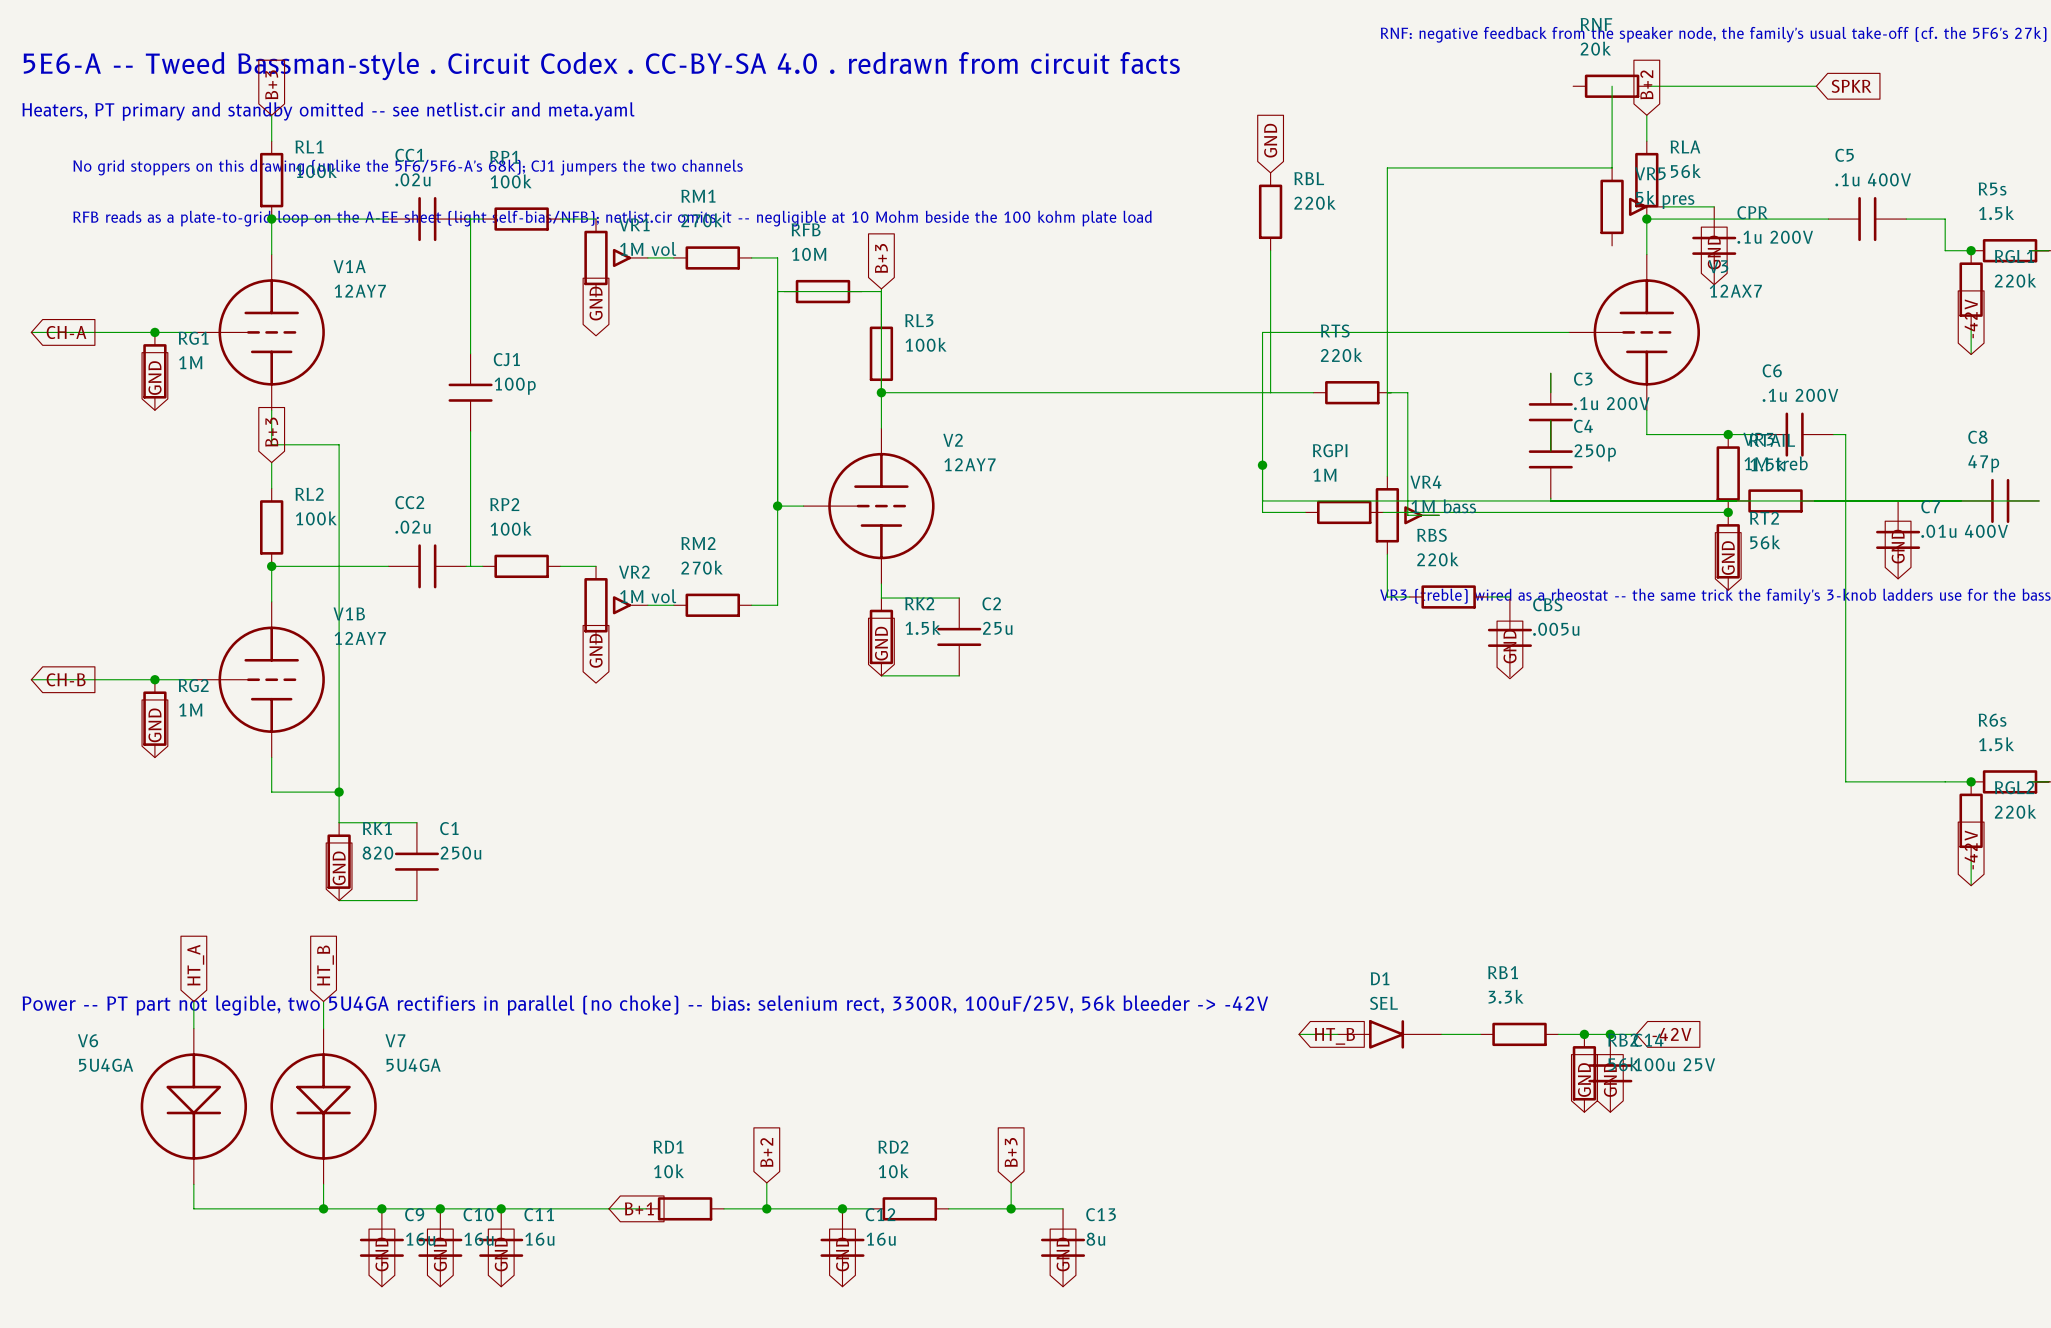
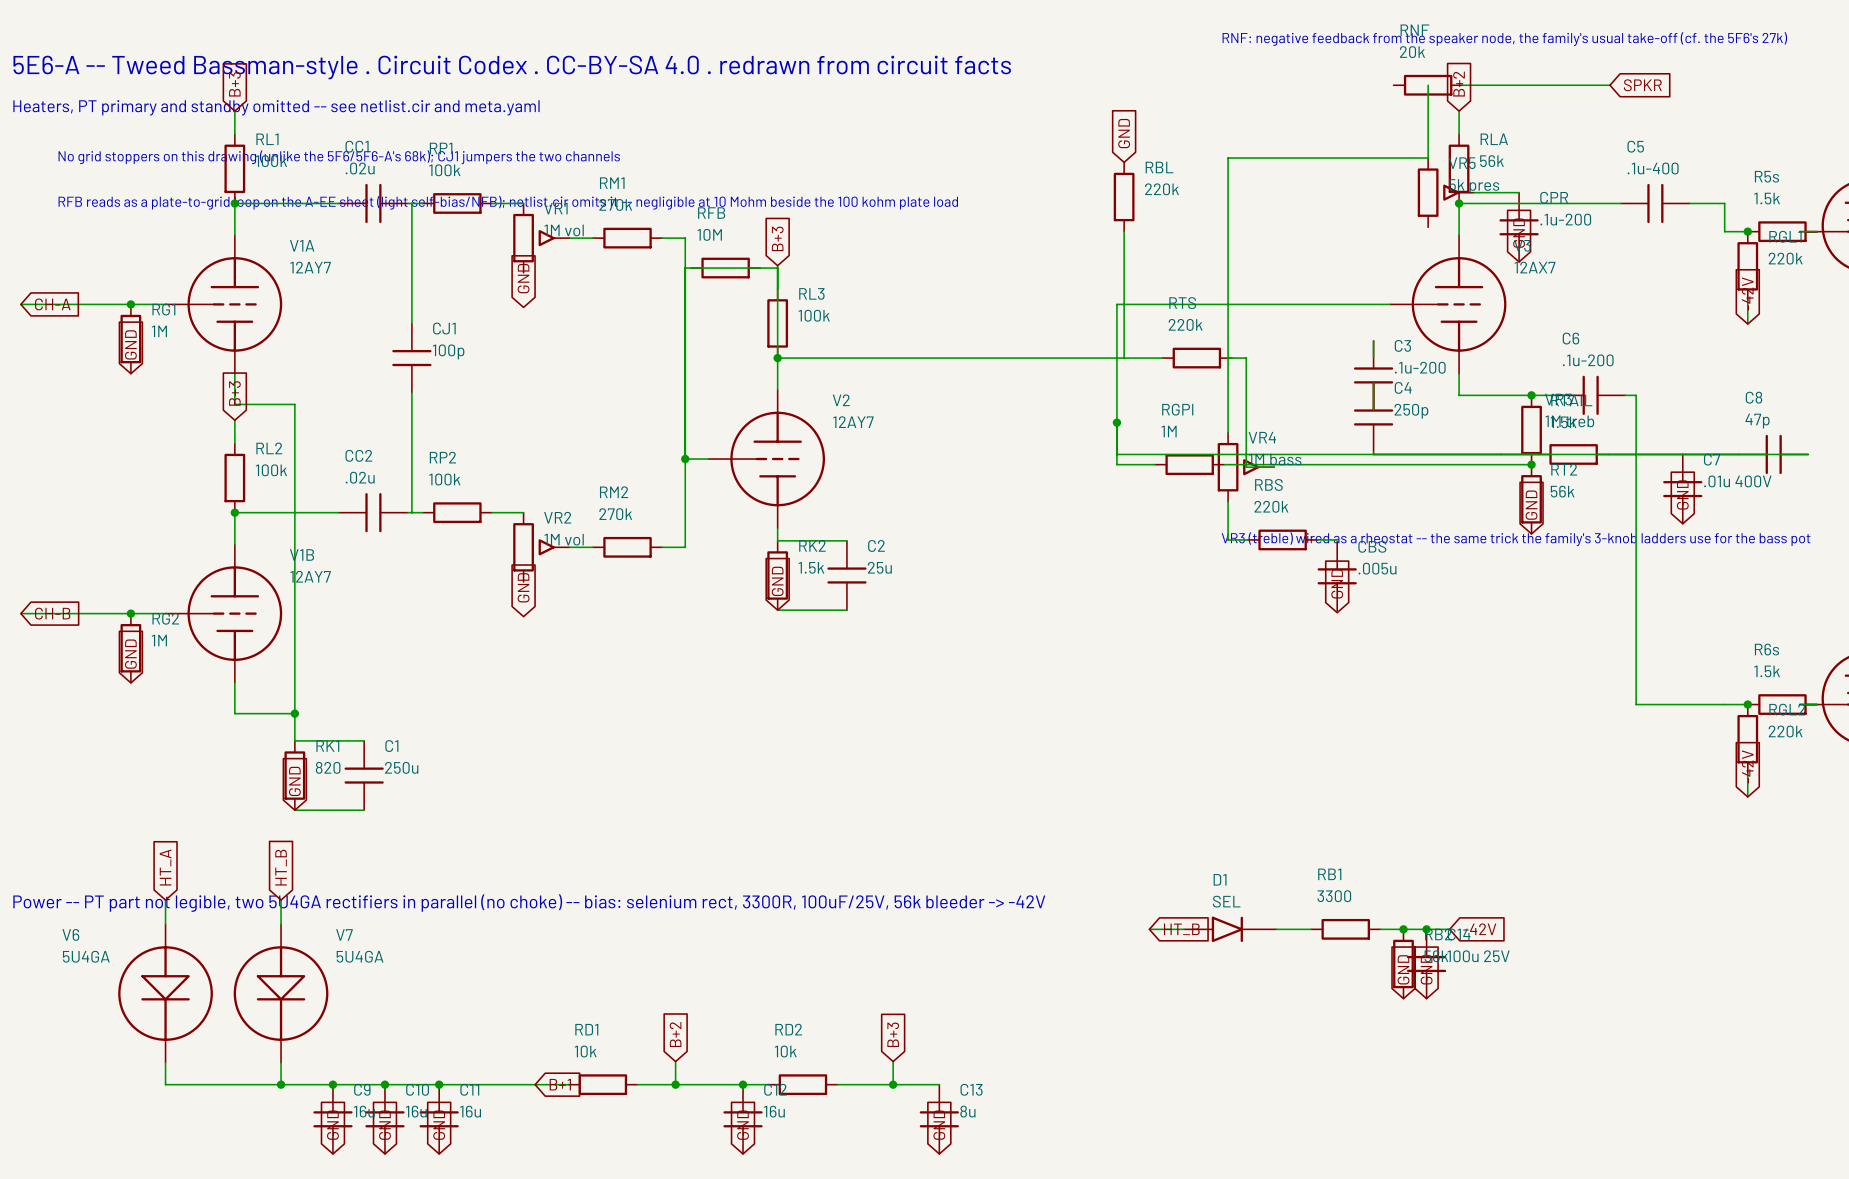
C5 value: .1u 400V (1873, 179) -> .1u-400 (1653, 168)
CPR value: .1u 200V (1775, 237) -> .1u-200 (1565, 219)
C6 value: .1u 200V (1800, 395) -> .1u-200 (1588, 360)
C3 value: .1u 200V (1611, 403) -> .1u-200 (1420, 367)
RB1 value: 3.3k (1506, 996) -> 3300 (1334, 896)

